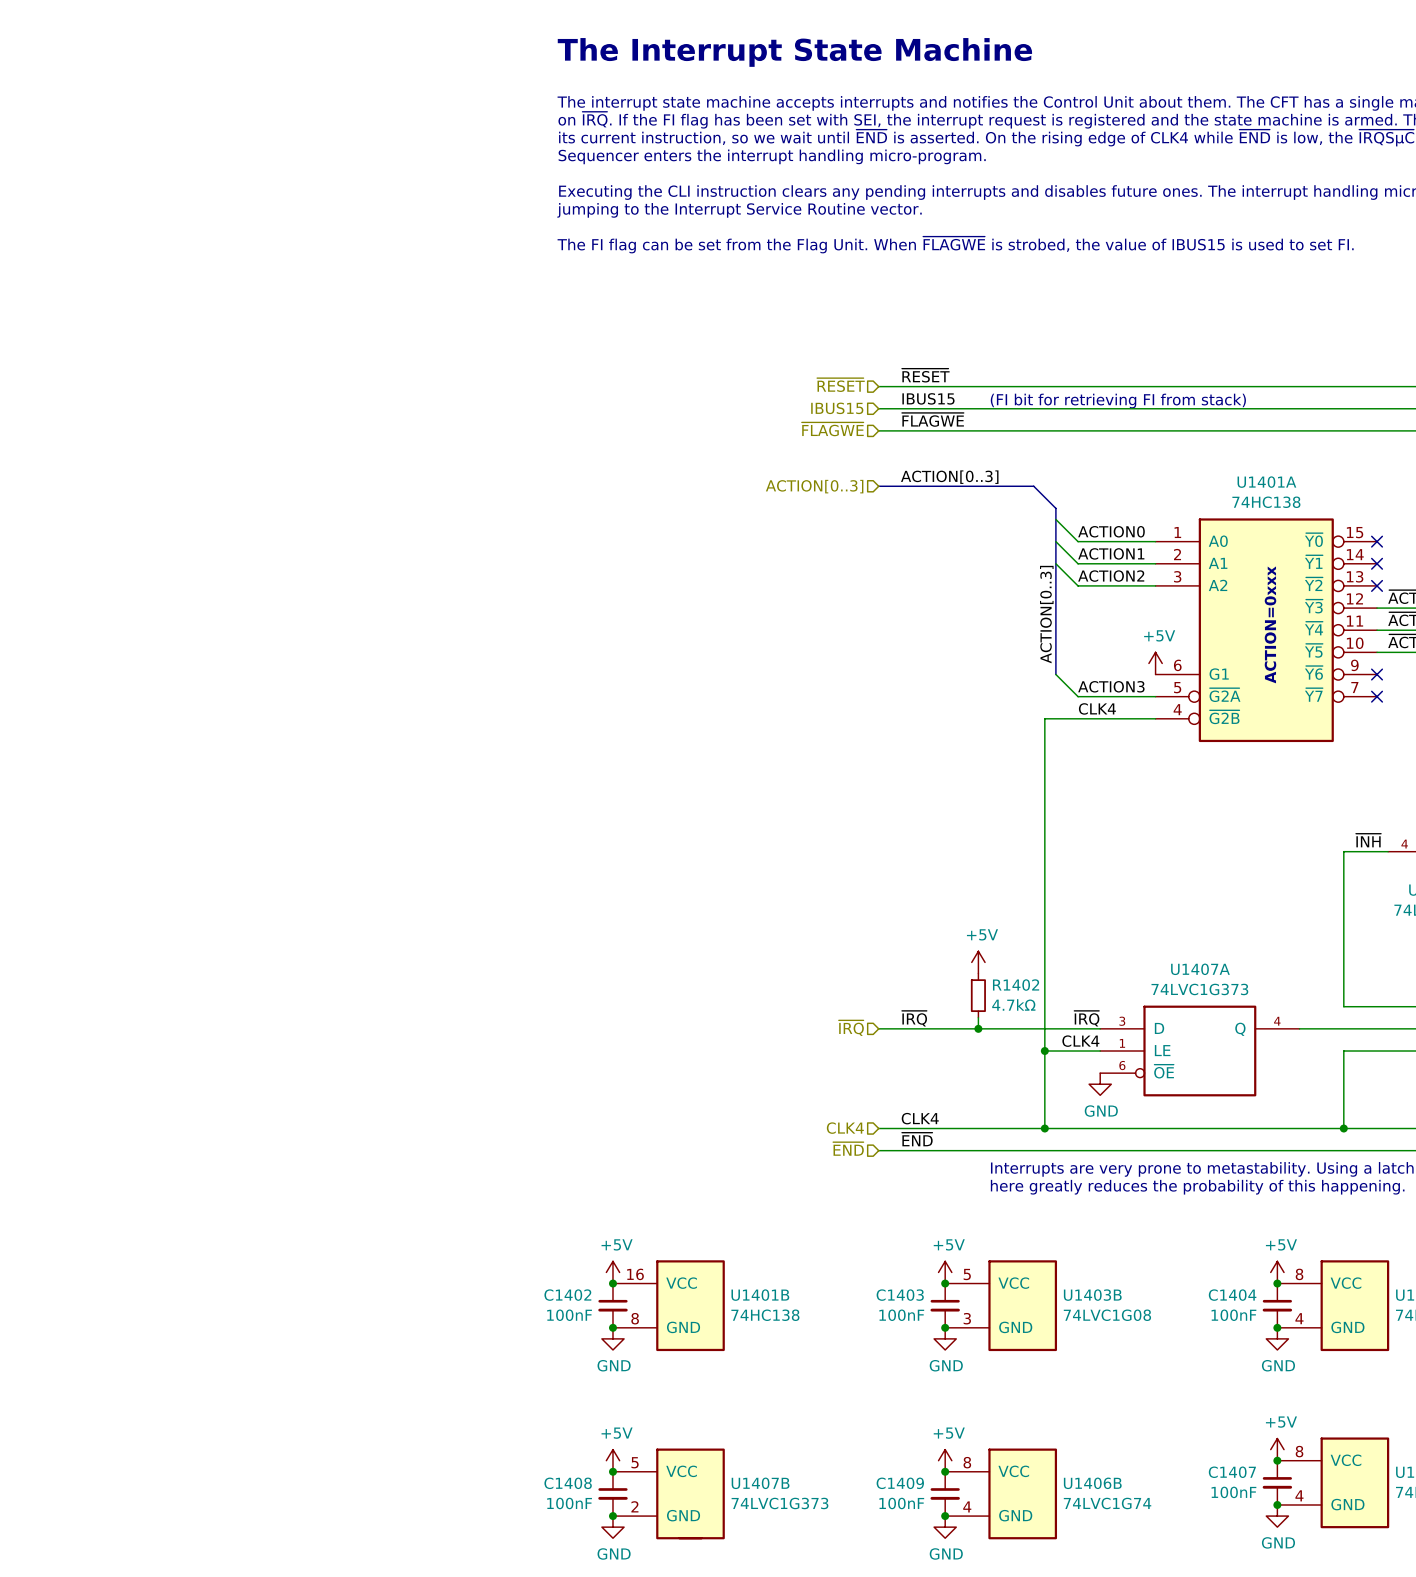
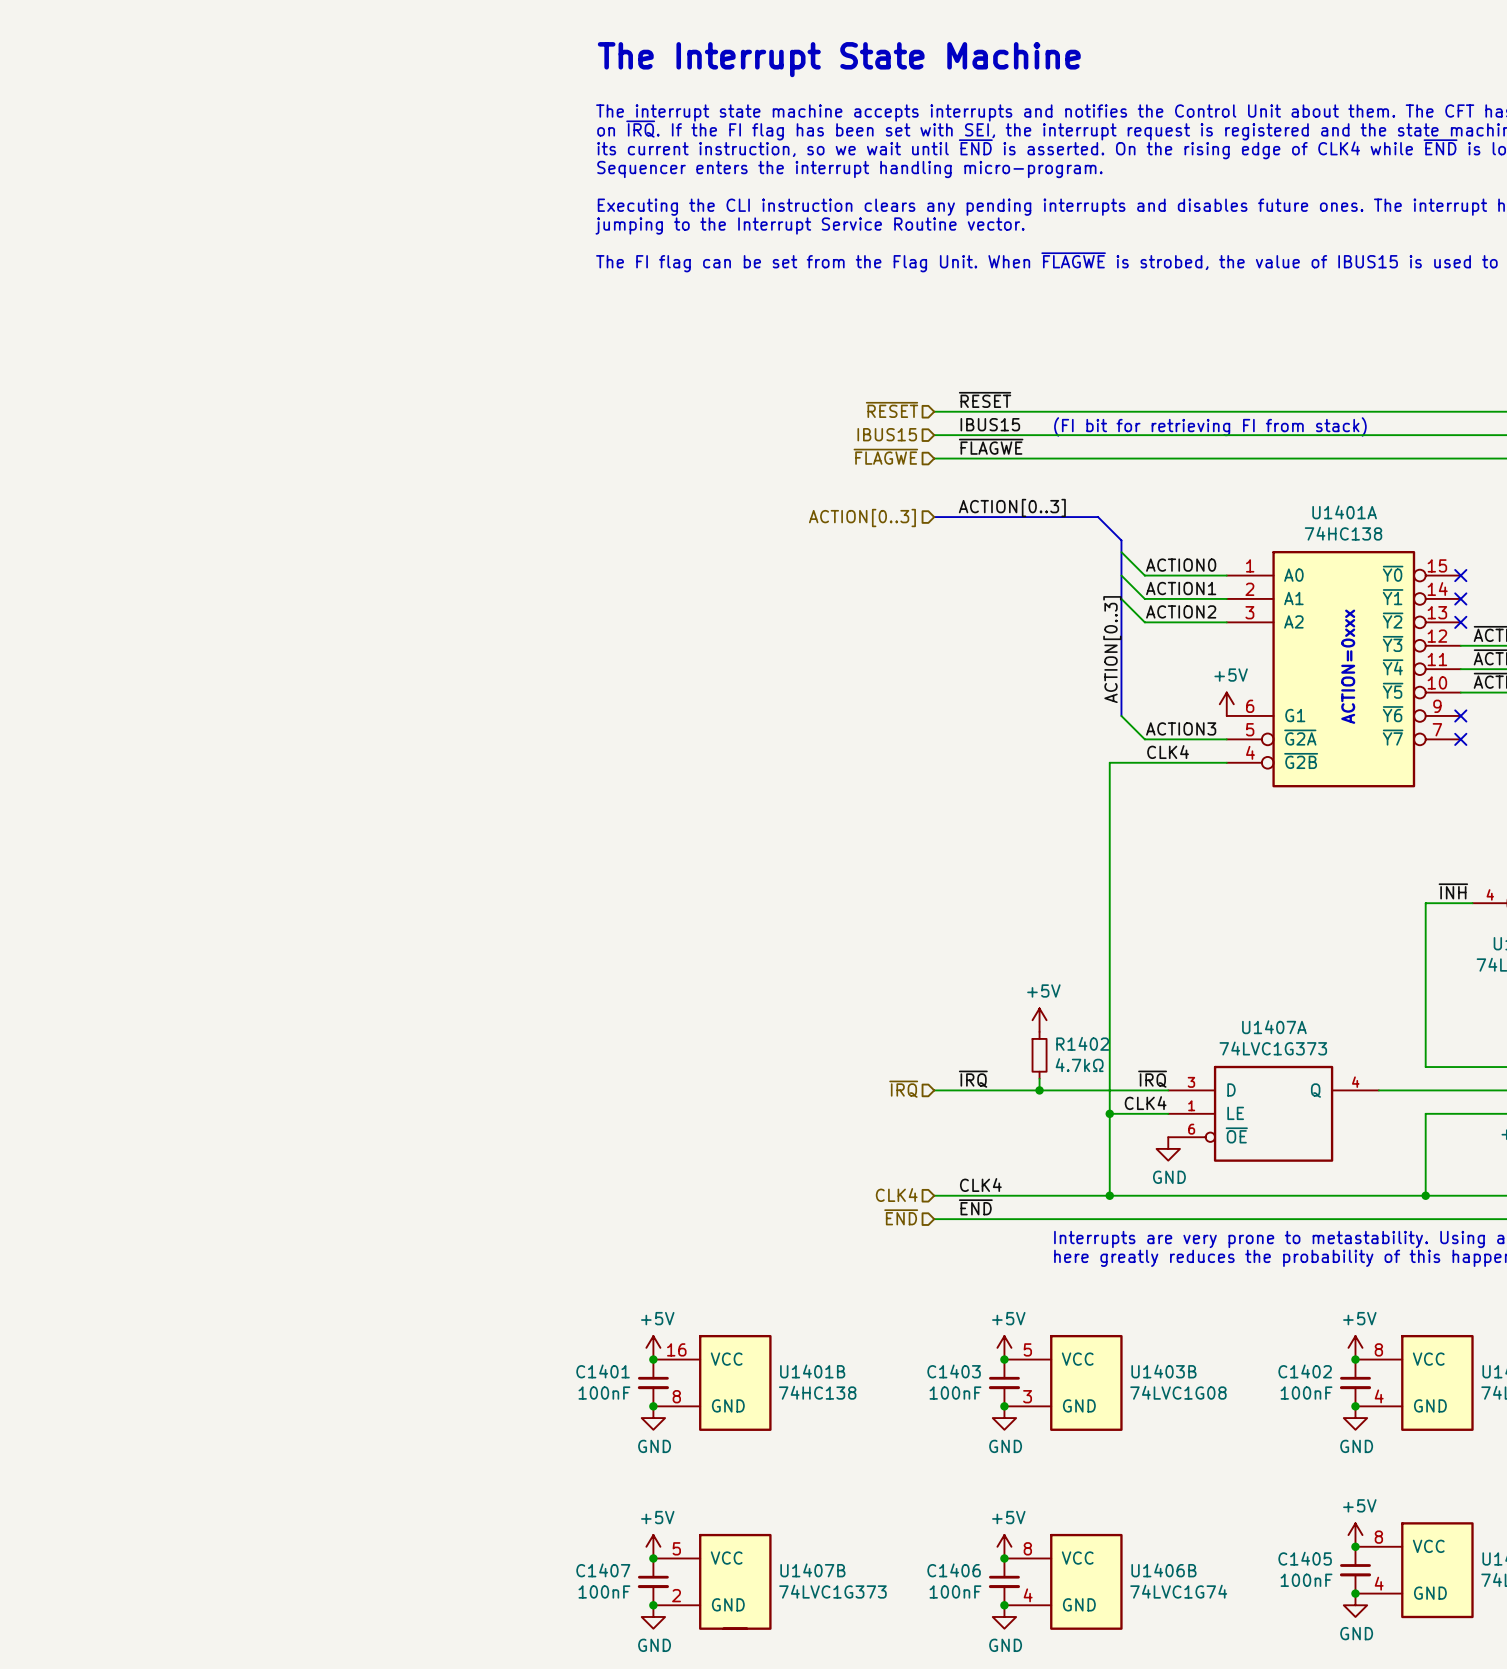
C1402 name: C1402 (567, 1295) -> C1401 (603, 1371)
C1404 name: C1404 (1232, 1295) -> C1402 (1305, 1371)
C1407 name: C1407 (1232, 1472) -> C1405 (1305, 1558)
C1408 name: C1408 (568, 1483) -> C1407 (603, 1570)
C1409 name: C1409 (900, 1483) -> C1406 (954, 1570)

